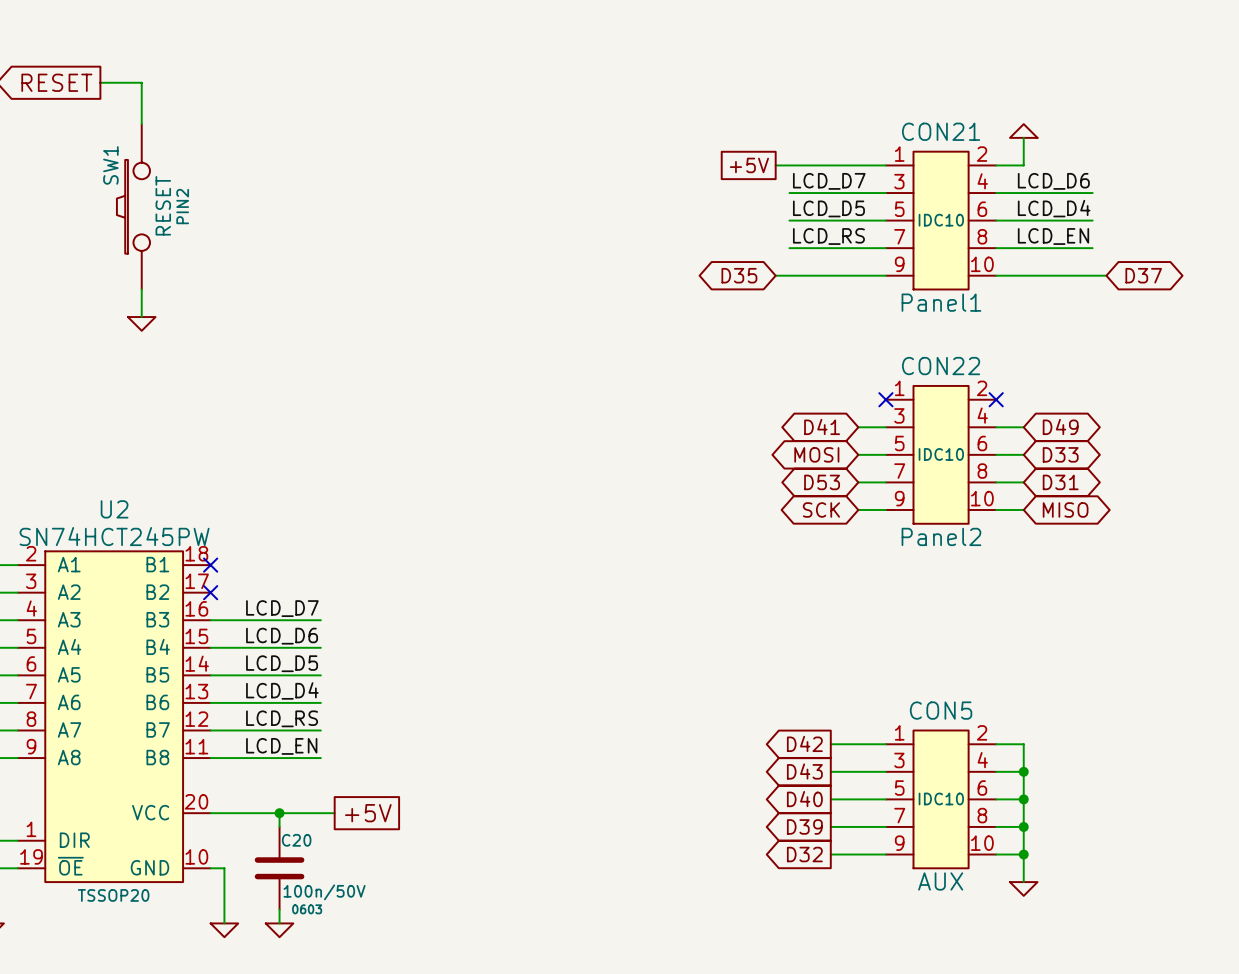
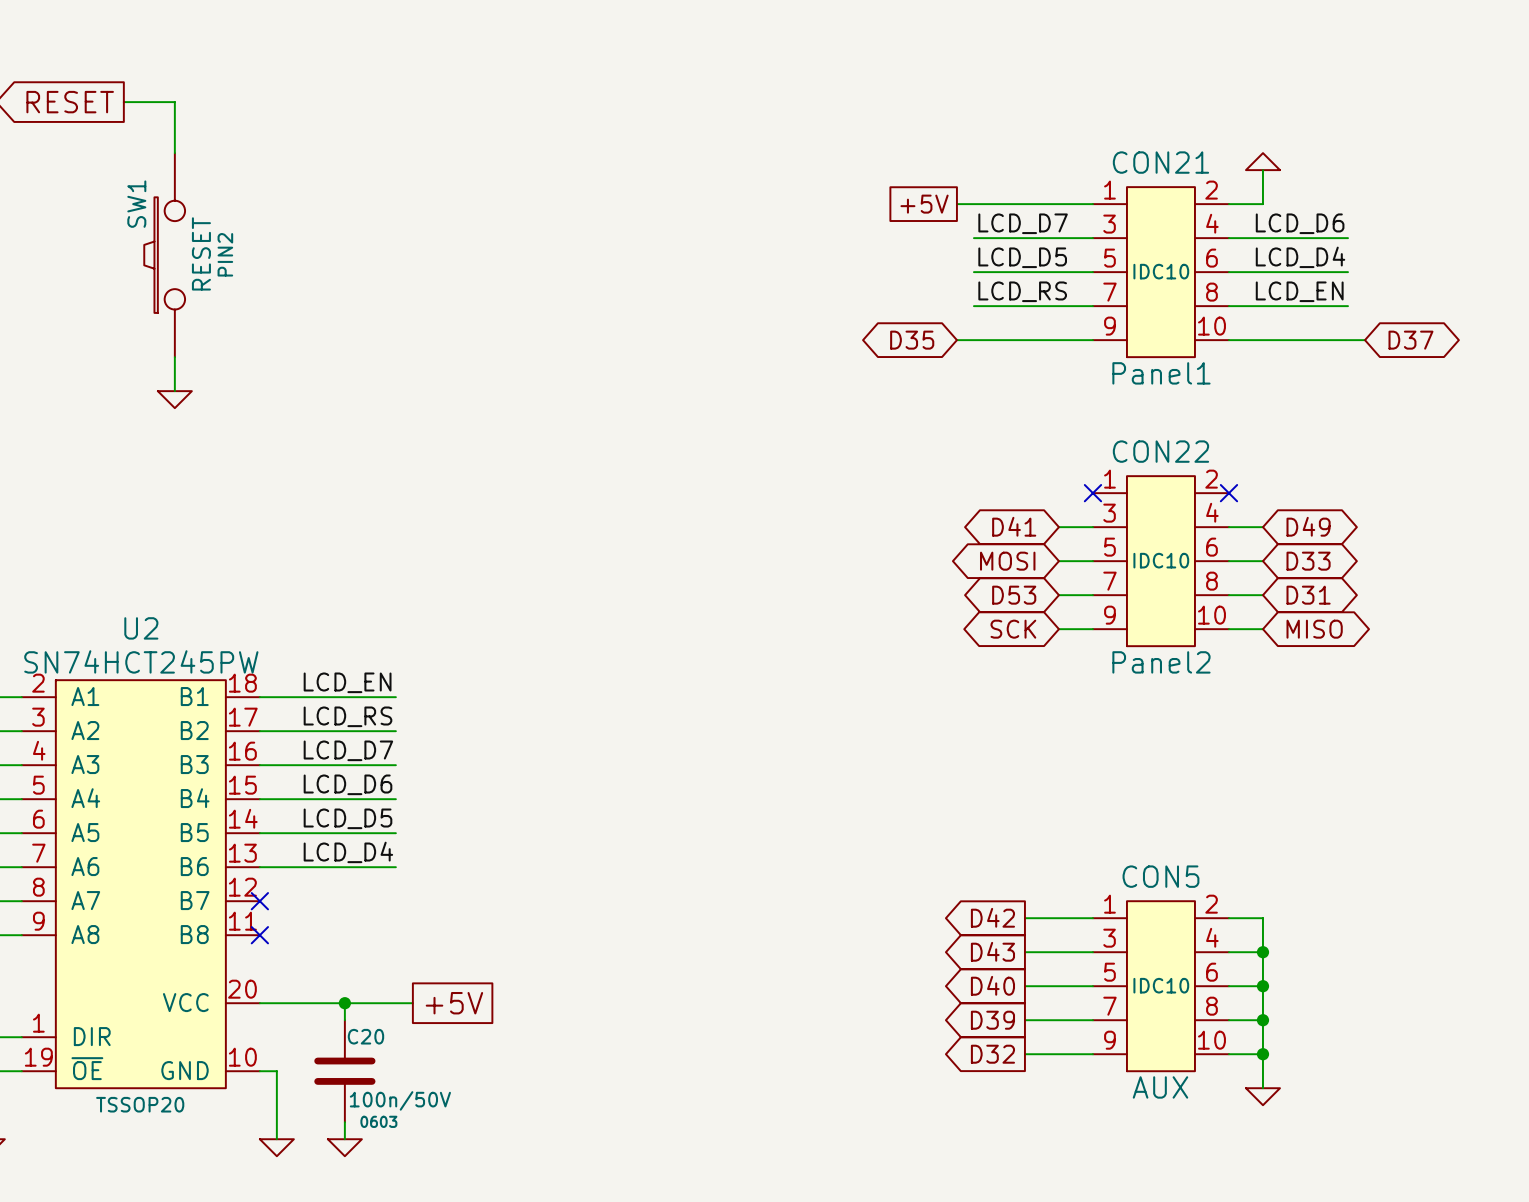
no-connect mark: (210, 565) -> none
no-connect mark: (210, 592) -> none
label position: LCD_RS (282, 718) -> LCD_RS (347, 716)
wire: (210, 730) (320, 730) -> (259, 731) (395, 731)
no-connect mark: none -> (259, 901)
label position: LCD_EN (281, 746) -> LCD_EN (347, 682)
wire: (210, 758) (320, 758) -> (259, 697) (395, 697)
no-connect mark: none -> (259, 935)

